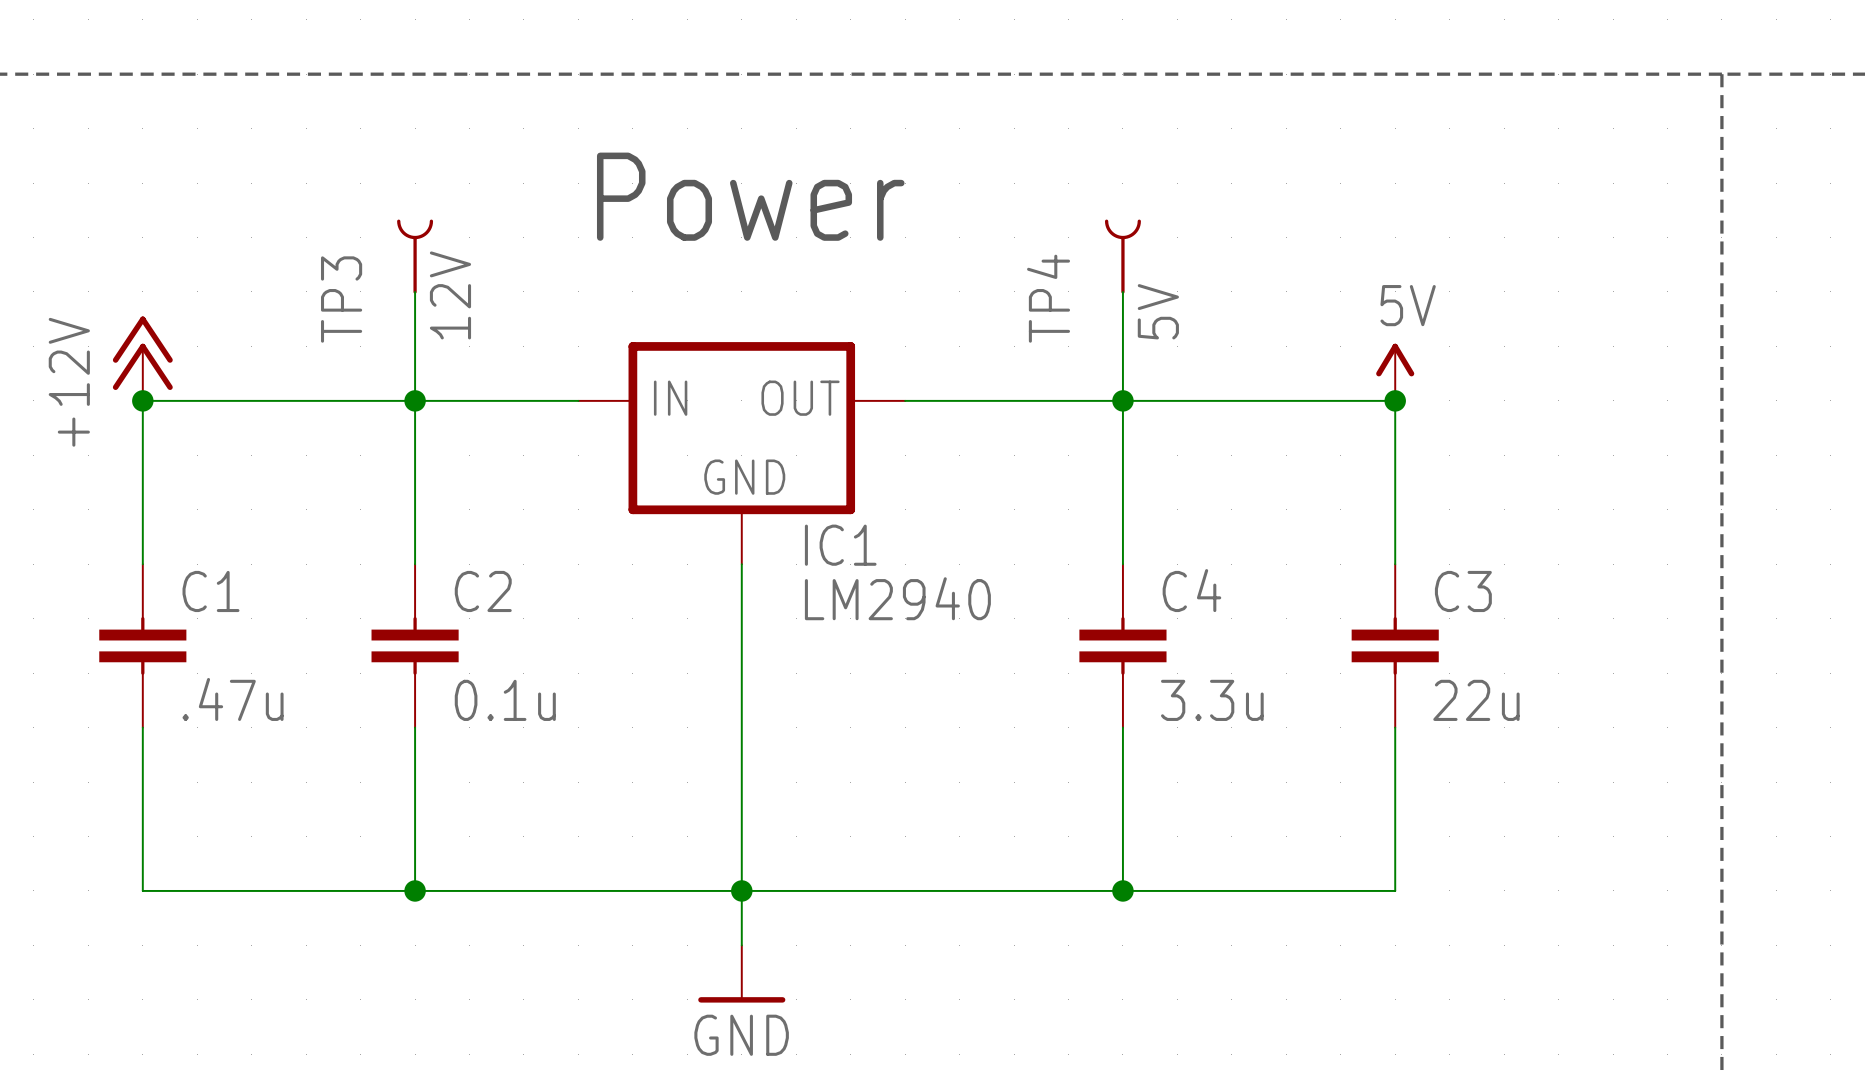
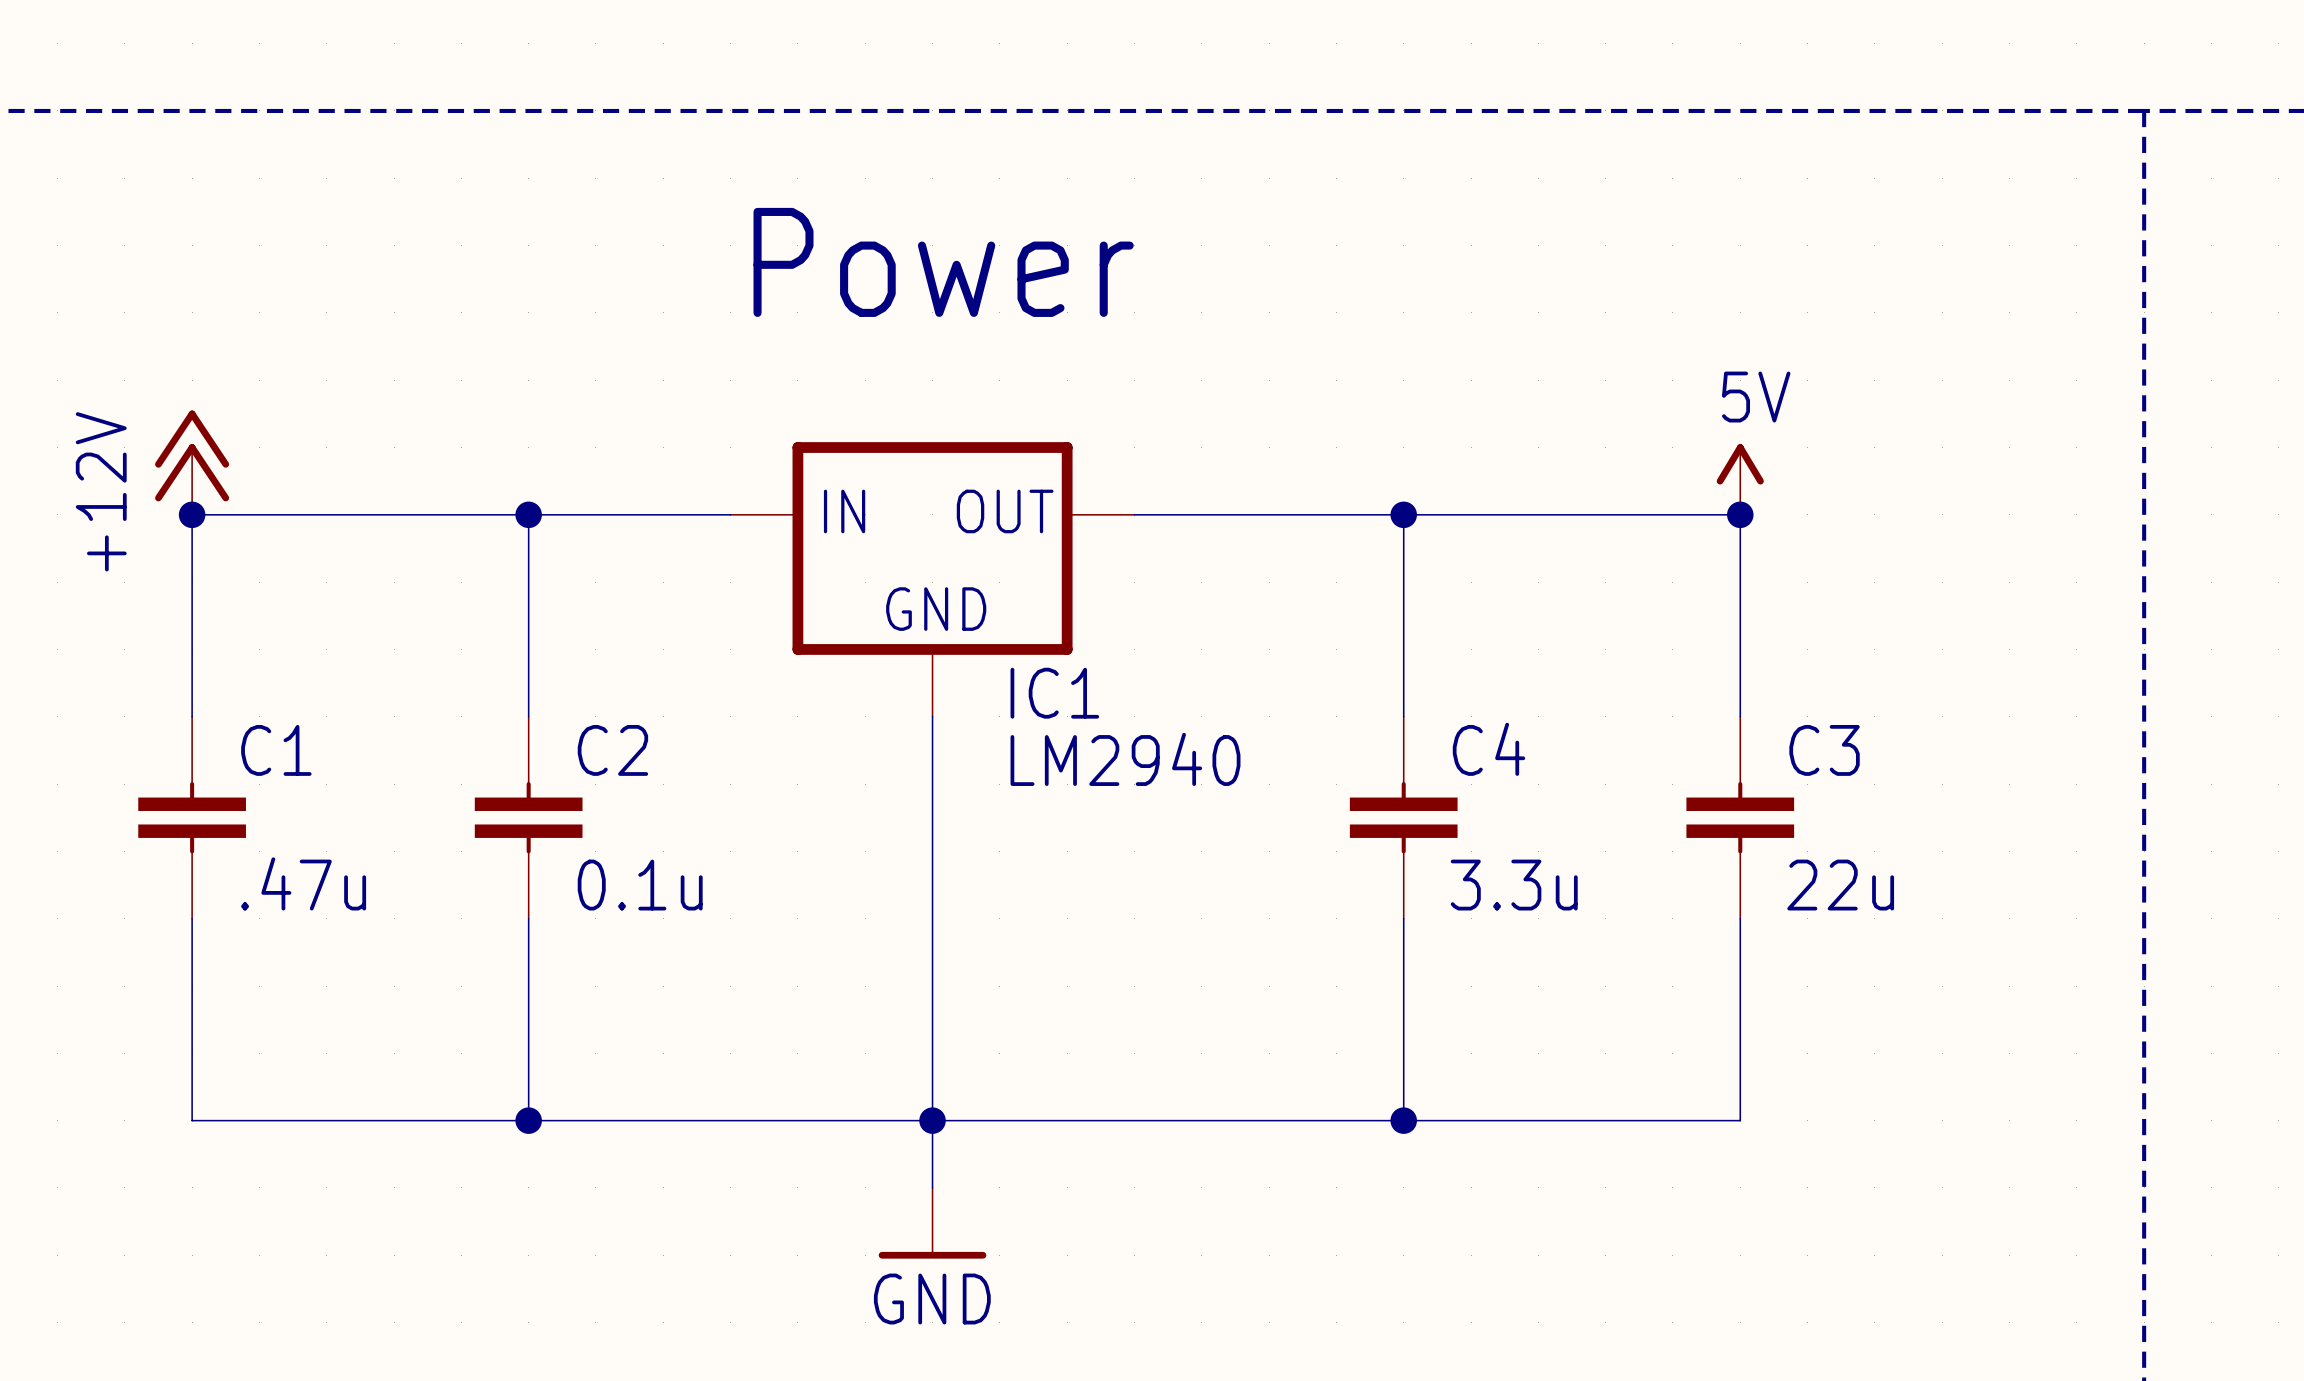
TP3: 12V (415, 256) -> none
TP4: 5V (1122, 256) -> none
wire: (415, 291) (415, 400) -> none
wire: (1122, 291) (1122, 400) -> none

